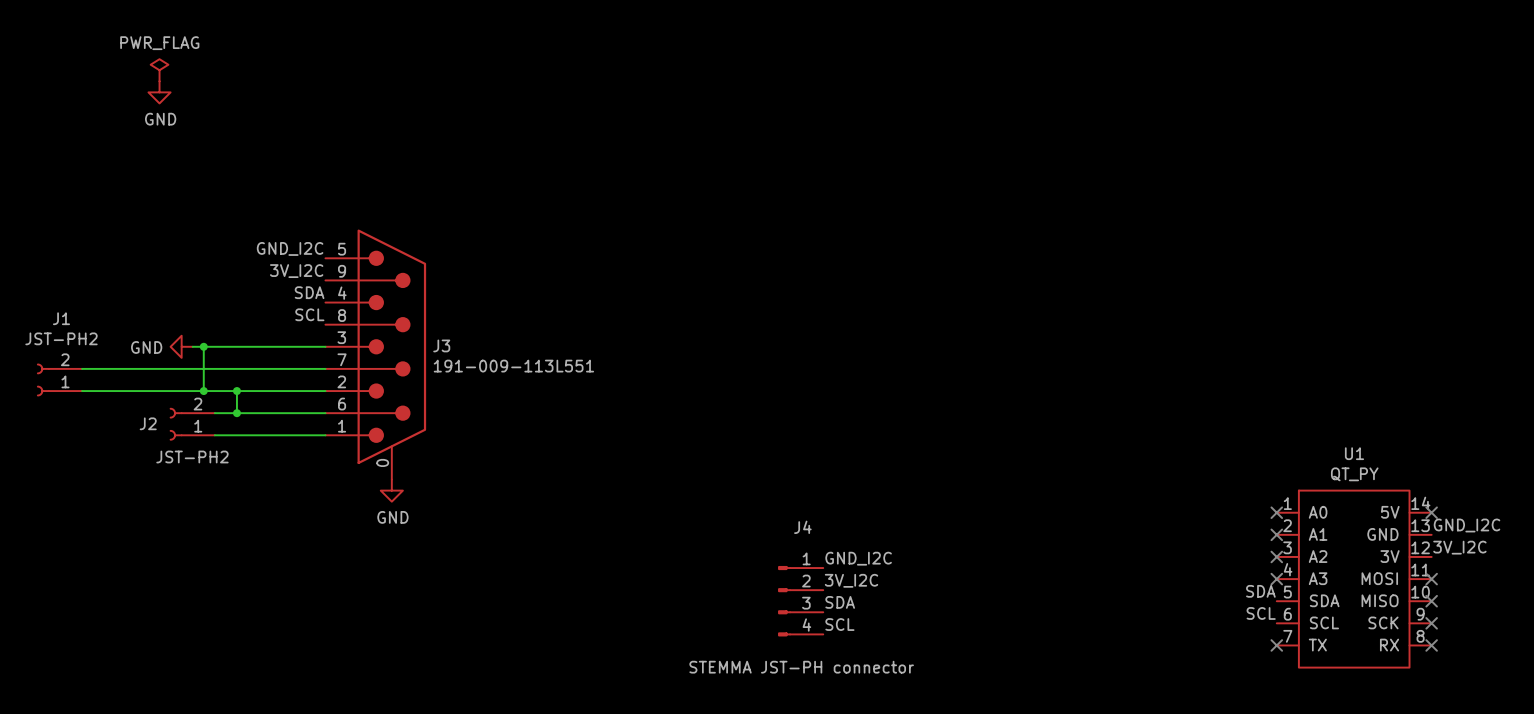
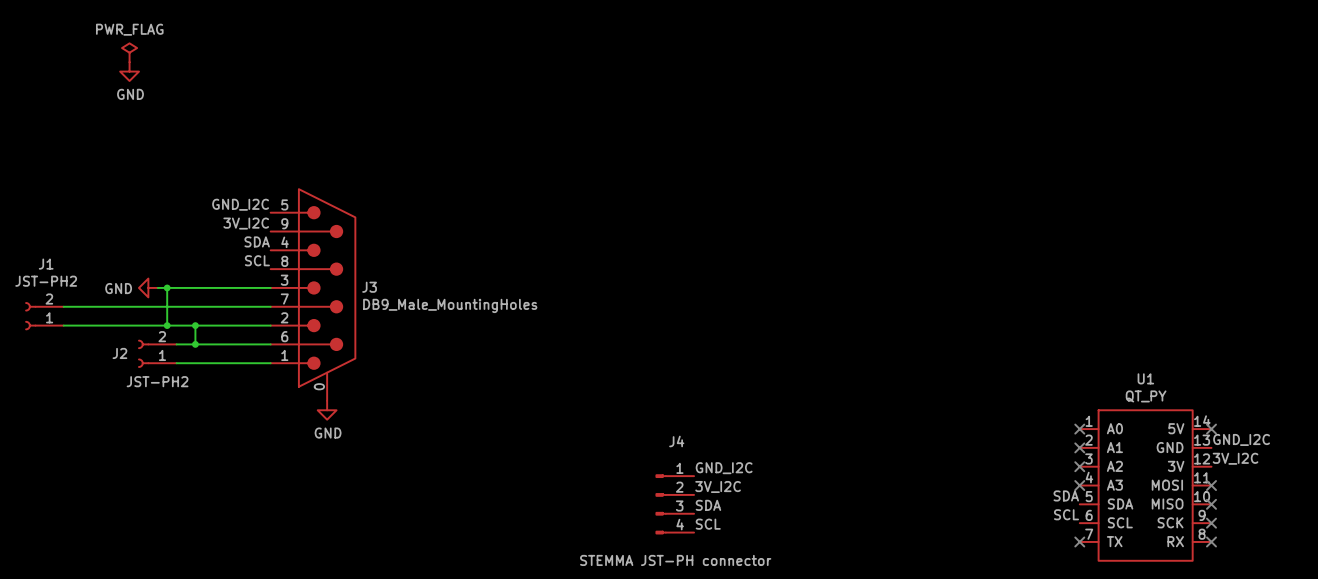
J3 value: 191-009-113L551 (513, 366) -> DB9_Male_MountingHoles (450, 305)

